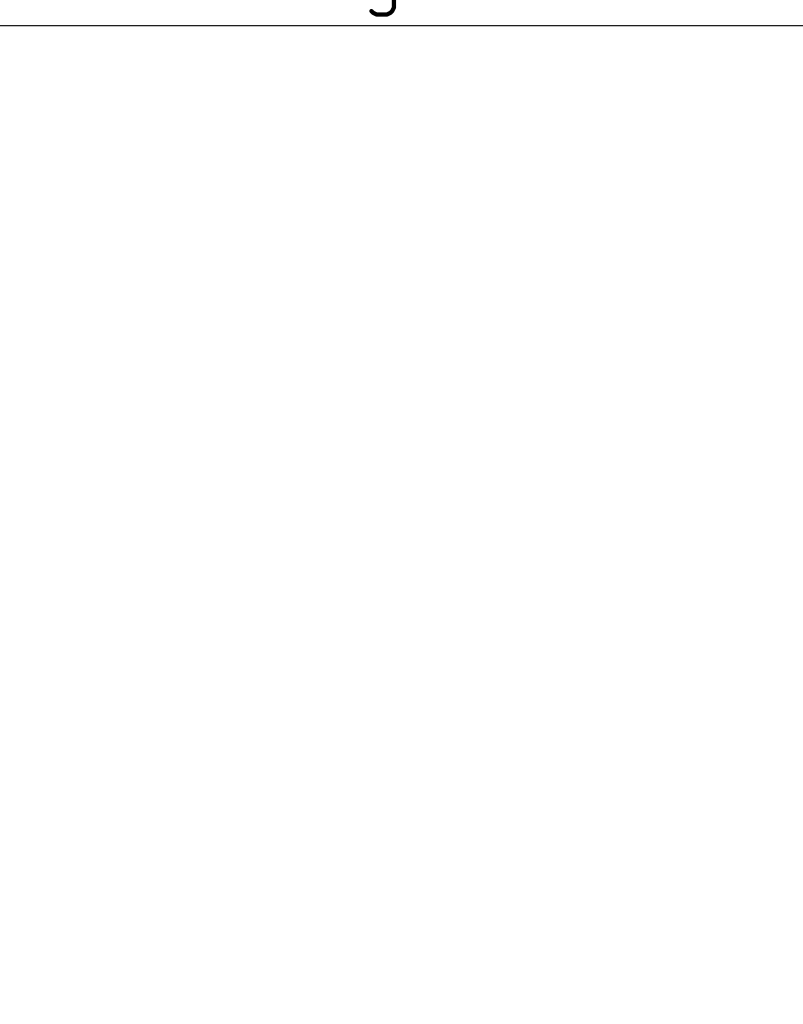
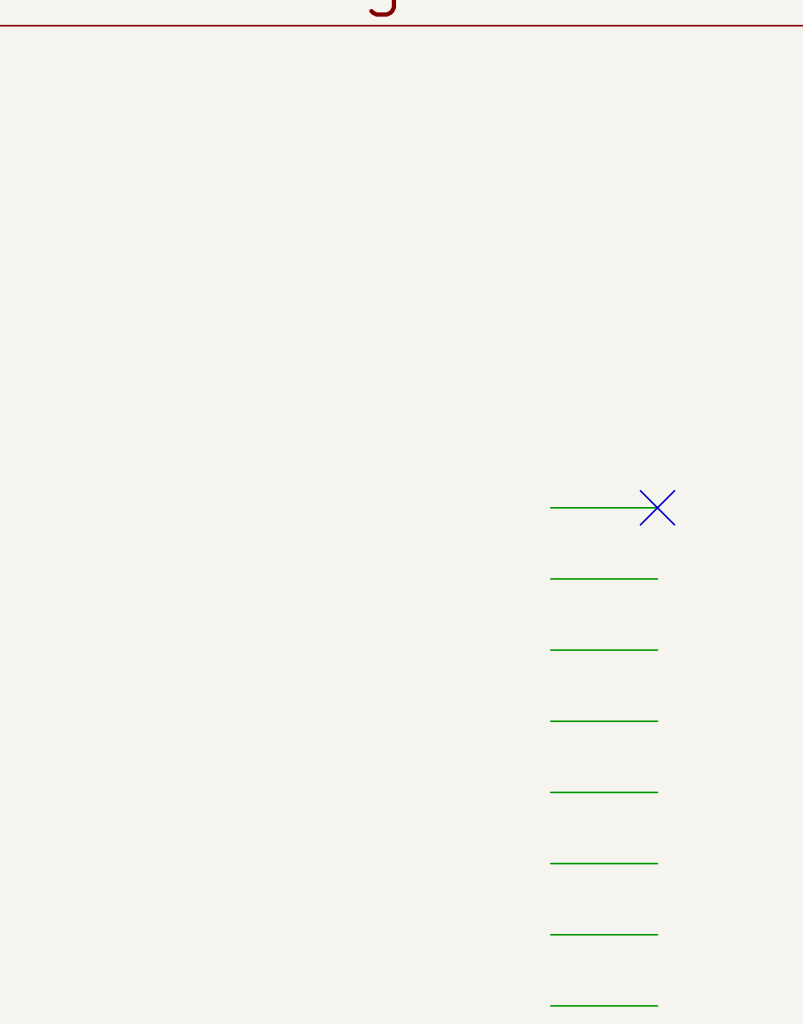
wire: none -> (550, 507) (657, 507)
no-connect mark: none -> (657, 507)
wire: none -> (550, 578) (657, 578)
wire: none -> (550, 650) (657, 650)
wire: none -> (550, 721) (657, 721)
wire: none -> (550, 792) (657, 792)
wire: none -> (550, 863) (657, 863)
wire: none -> (550, 934) (657, 934)
wire: none -> (550, 1005) (657, 1005)

